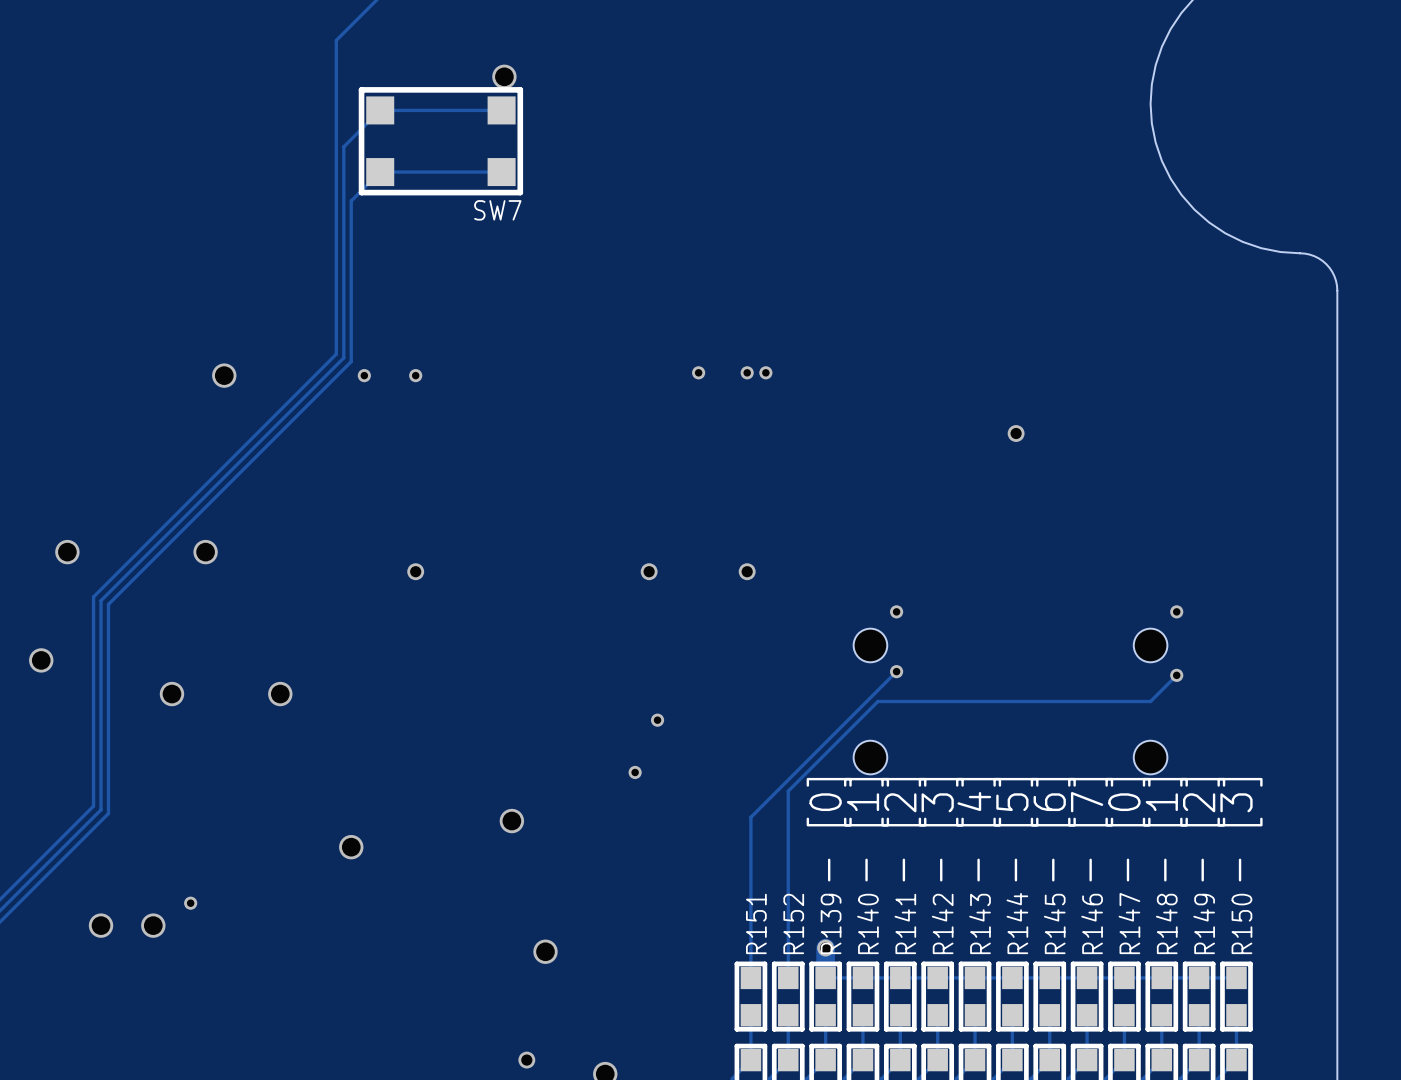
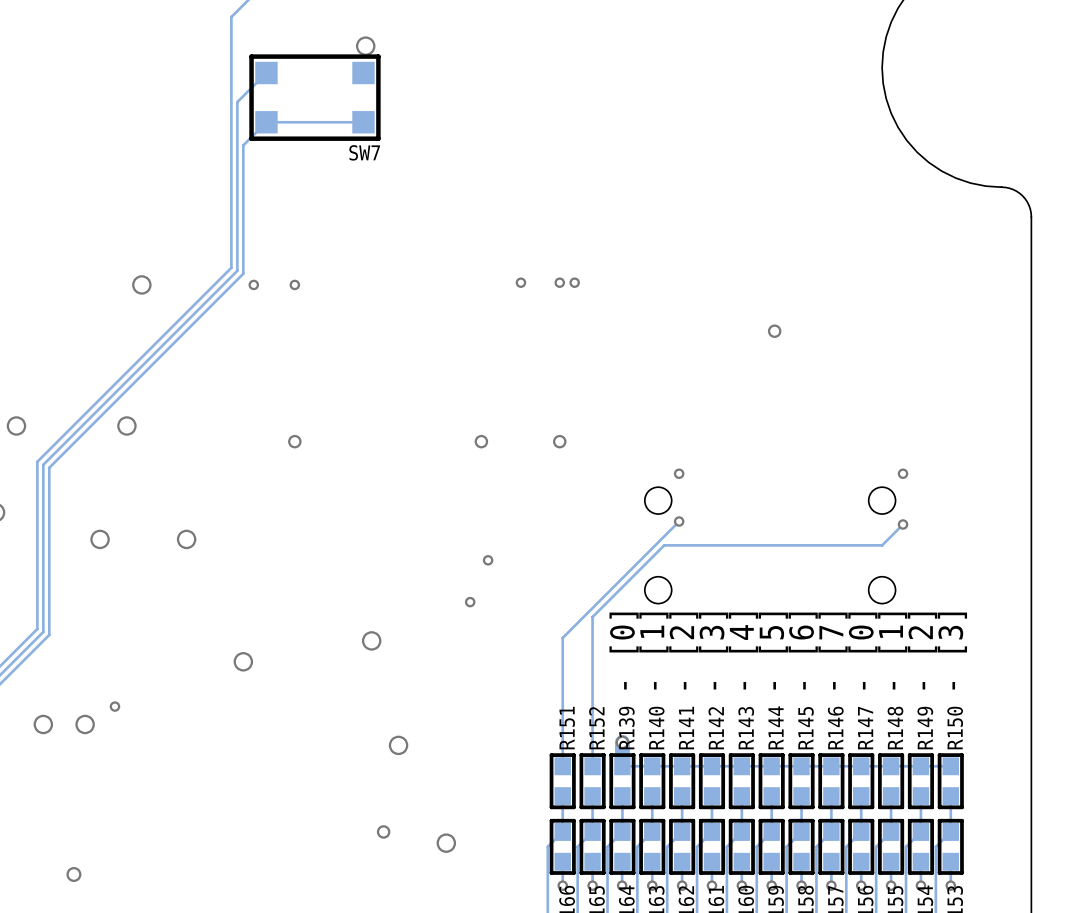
track: (501, 110) (380, 110) -> none

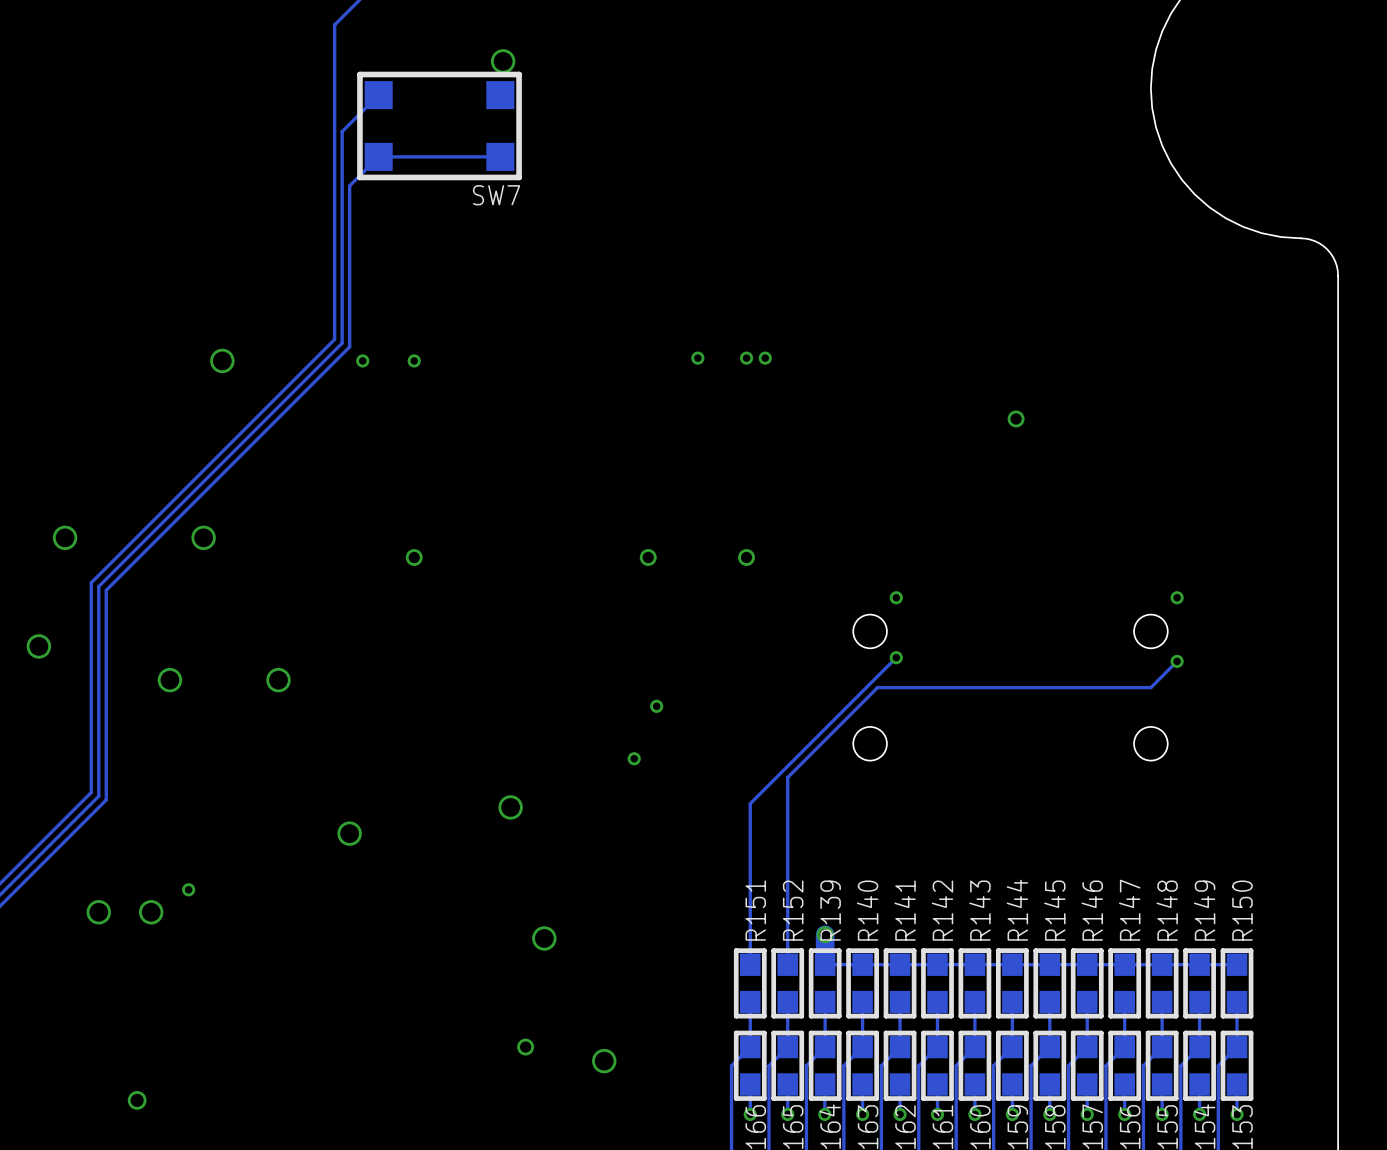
text: - [0] (624, 651) -> none
text: - [1] (653, 651) -> none
text: - [2] (683, 651) -> none
text: - [3] (713, 651) -> none
text: - [4] (743, 651) -> none
text: - [5] (773, 651) -> none
text: - [6] (803, 651) -> none
text: - [7] (833, 651) -> none
text: - [0] (862, 651) -> none
text: - [1] (892, 651) -> none
text: - [2] (922, 651) -> none
text: - [3] (952, 651) -> none

